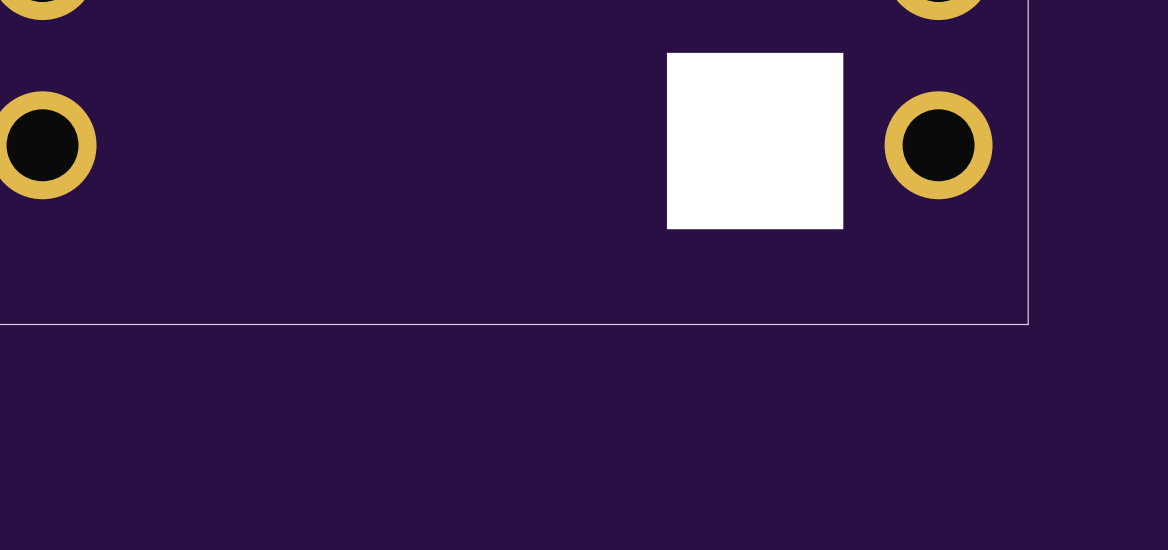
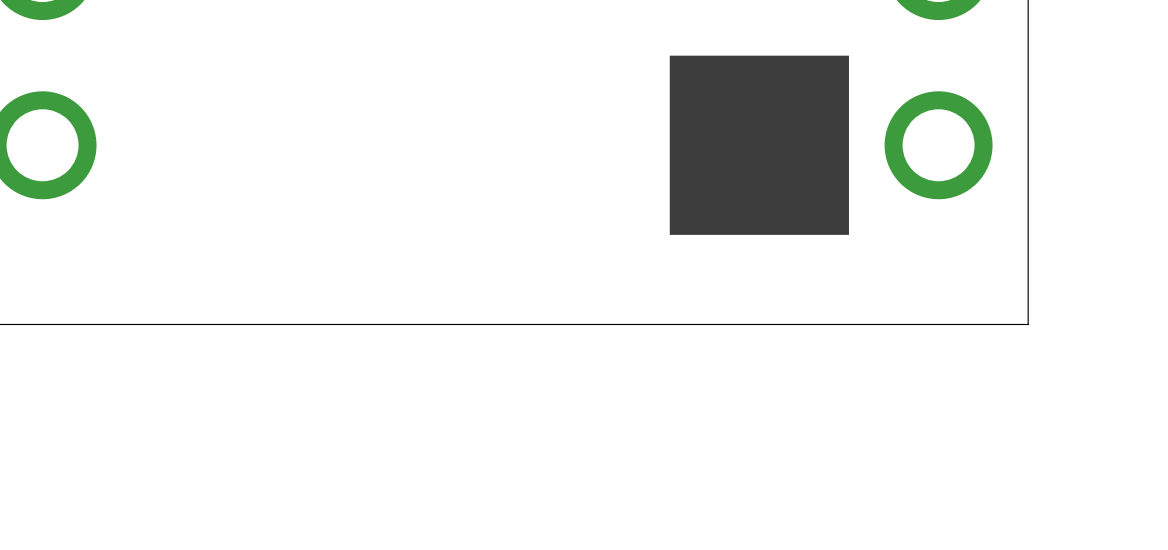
drawing shape: [666, 52, 844, 230] -> [669, 55, 849, 235]

